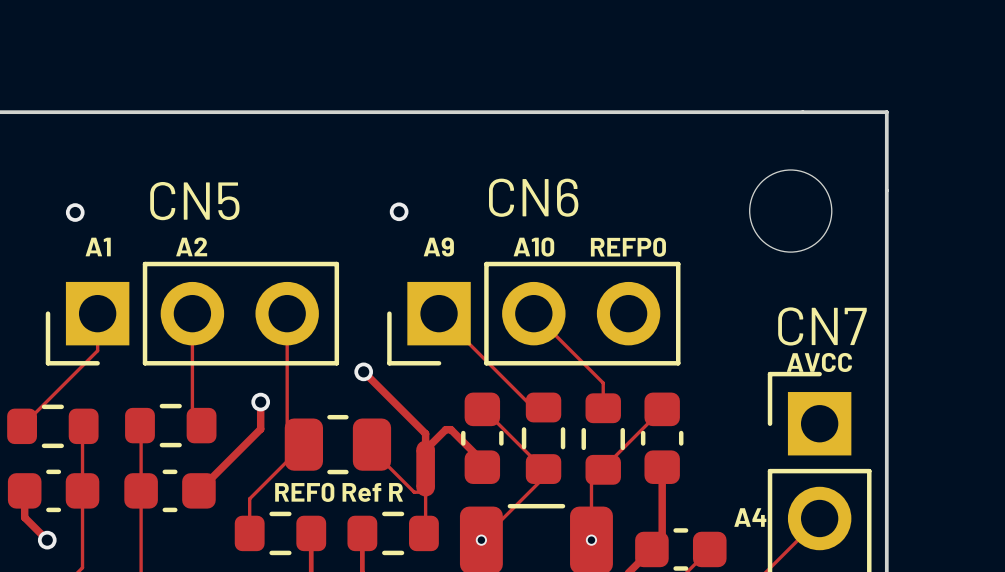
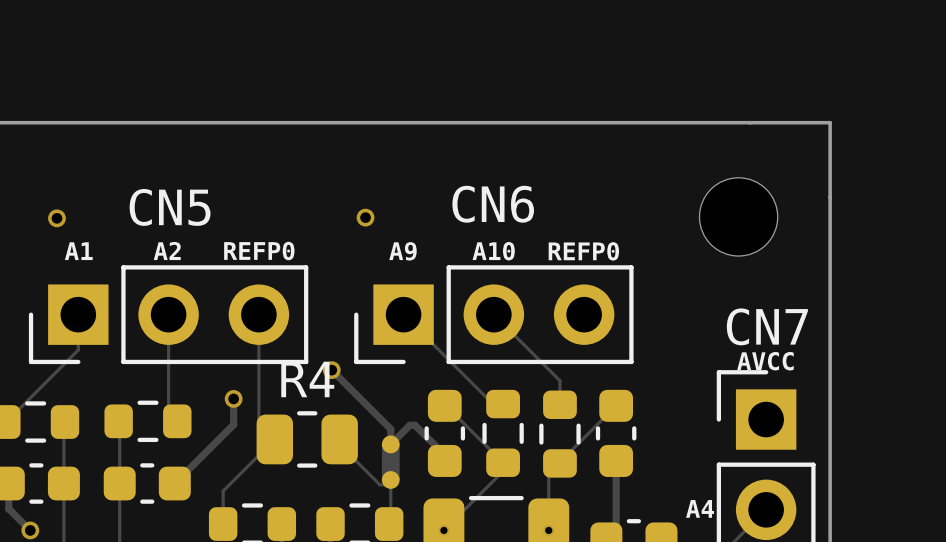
text: none -> REFP0 (259, 251)
R4 name: none -> R4 (307, 379)
text: REF0 Ref R (339, 492) -> none

